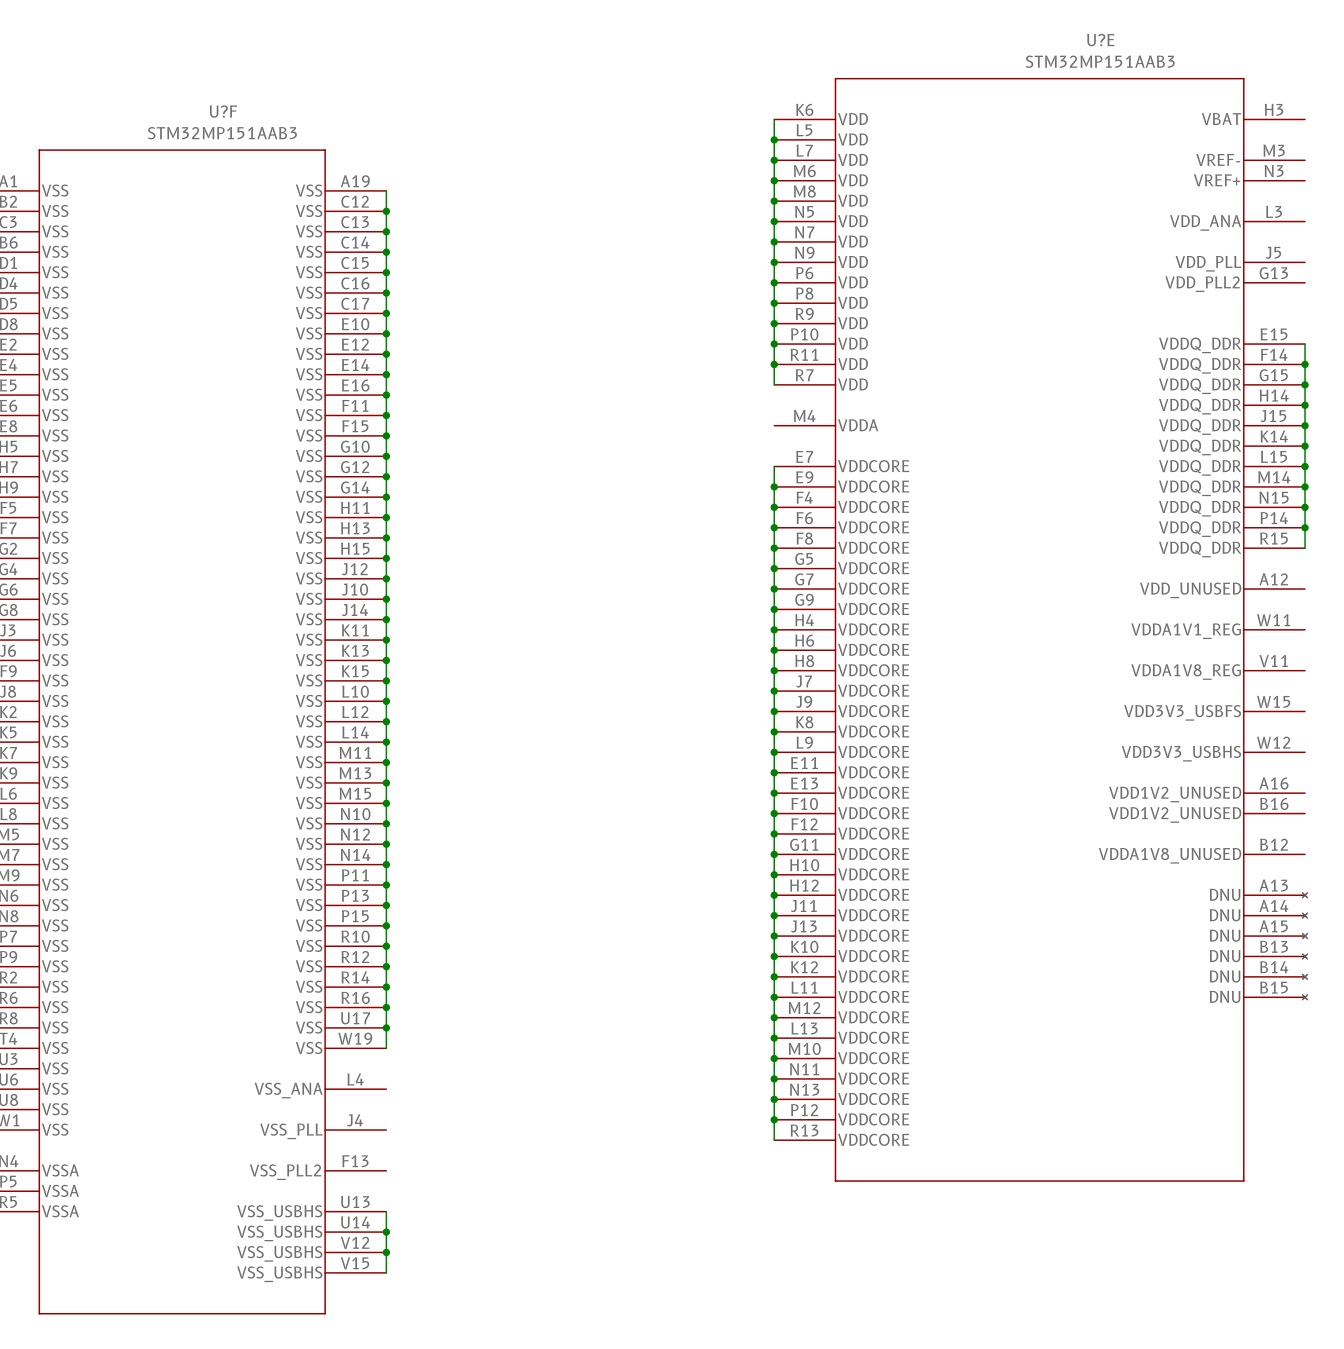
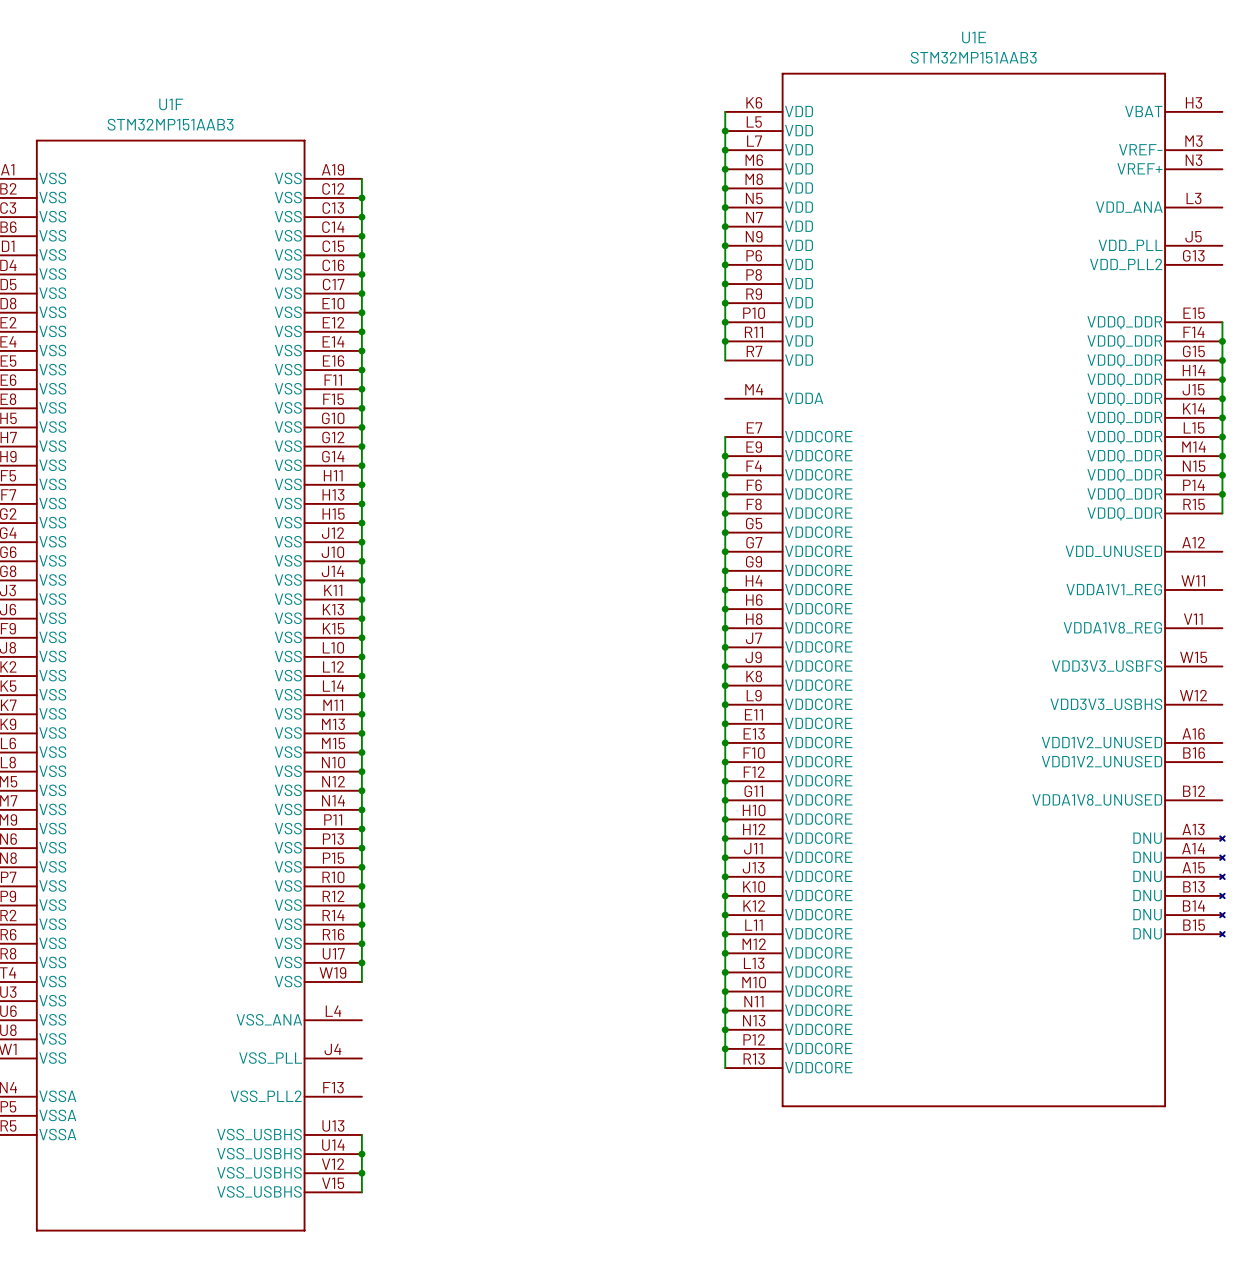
U?E name: U?E (1100, 40) -> U1E (974, 37)
U?E value position: STM32MP151AAB3 (1100, 61) -> STM32MP151AAB3 (973, 57)
U?F name: U?F (223, 111) -> U1F (171, 104)
U?F value position: STM32MP151AAB3 (222, 133) -> STM32MP151AAB3 (170, 124)

